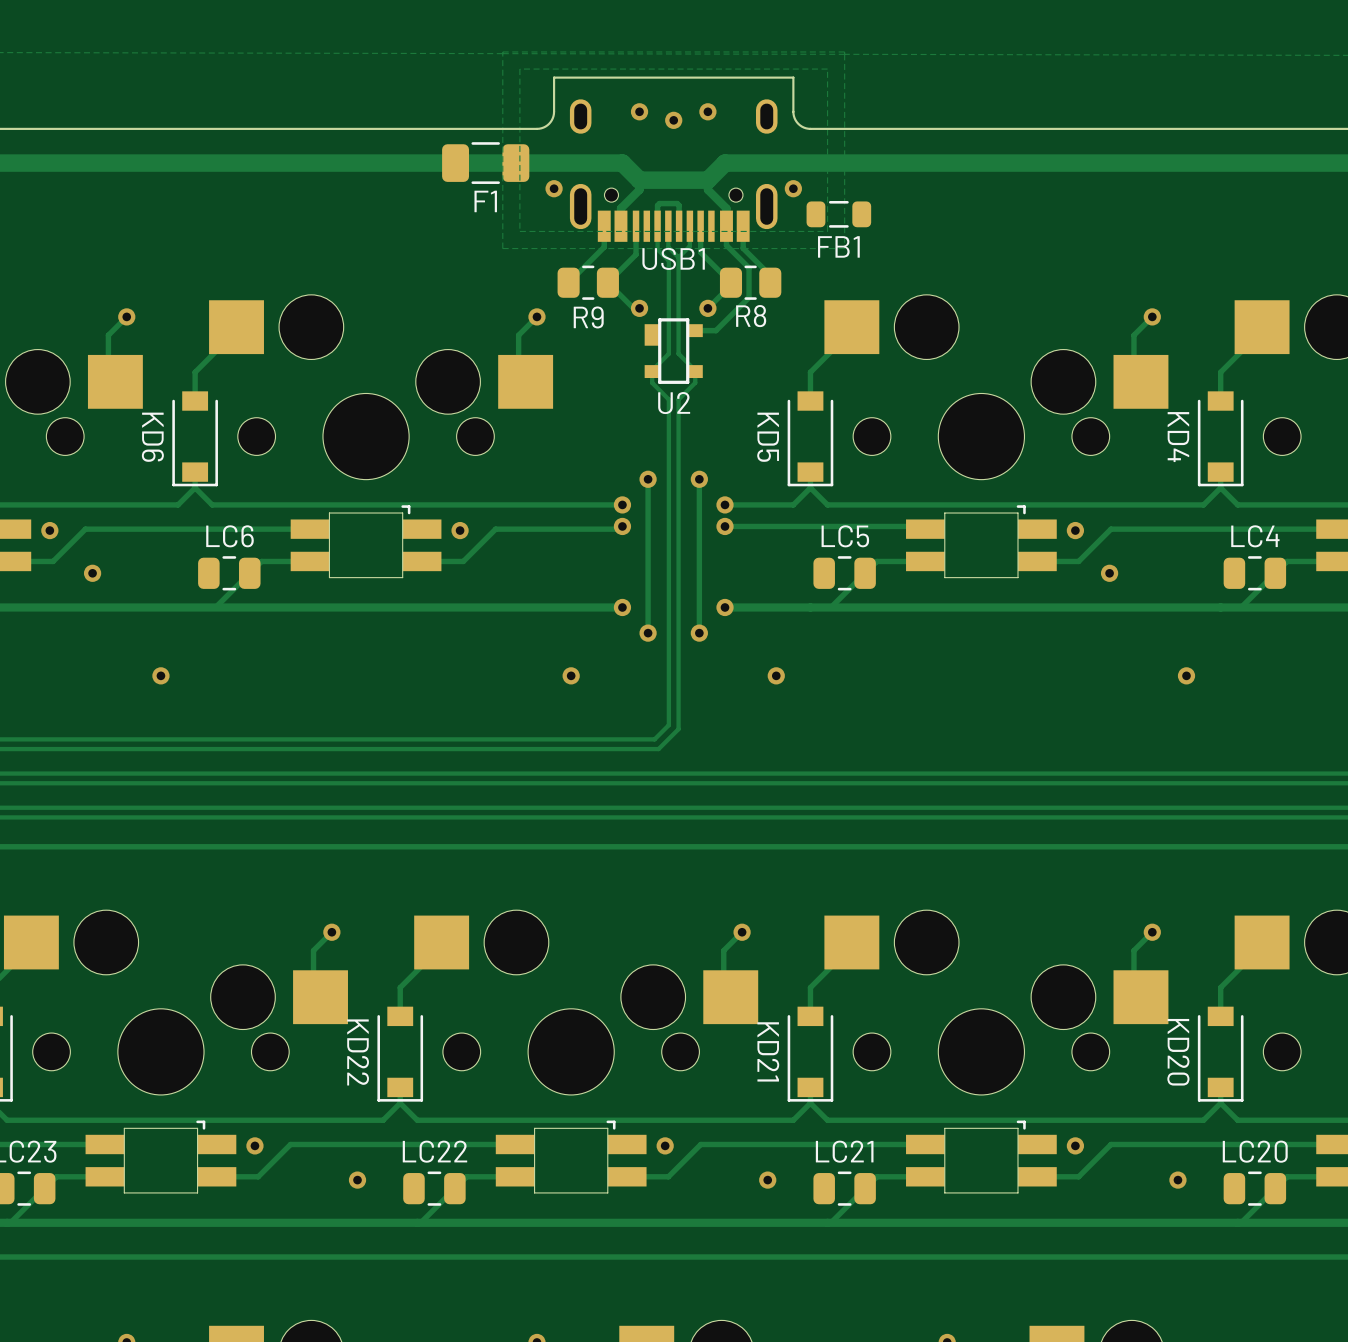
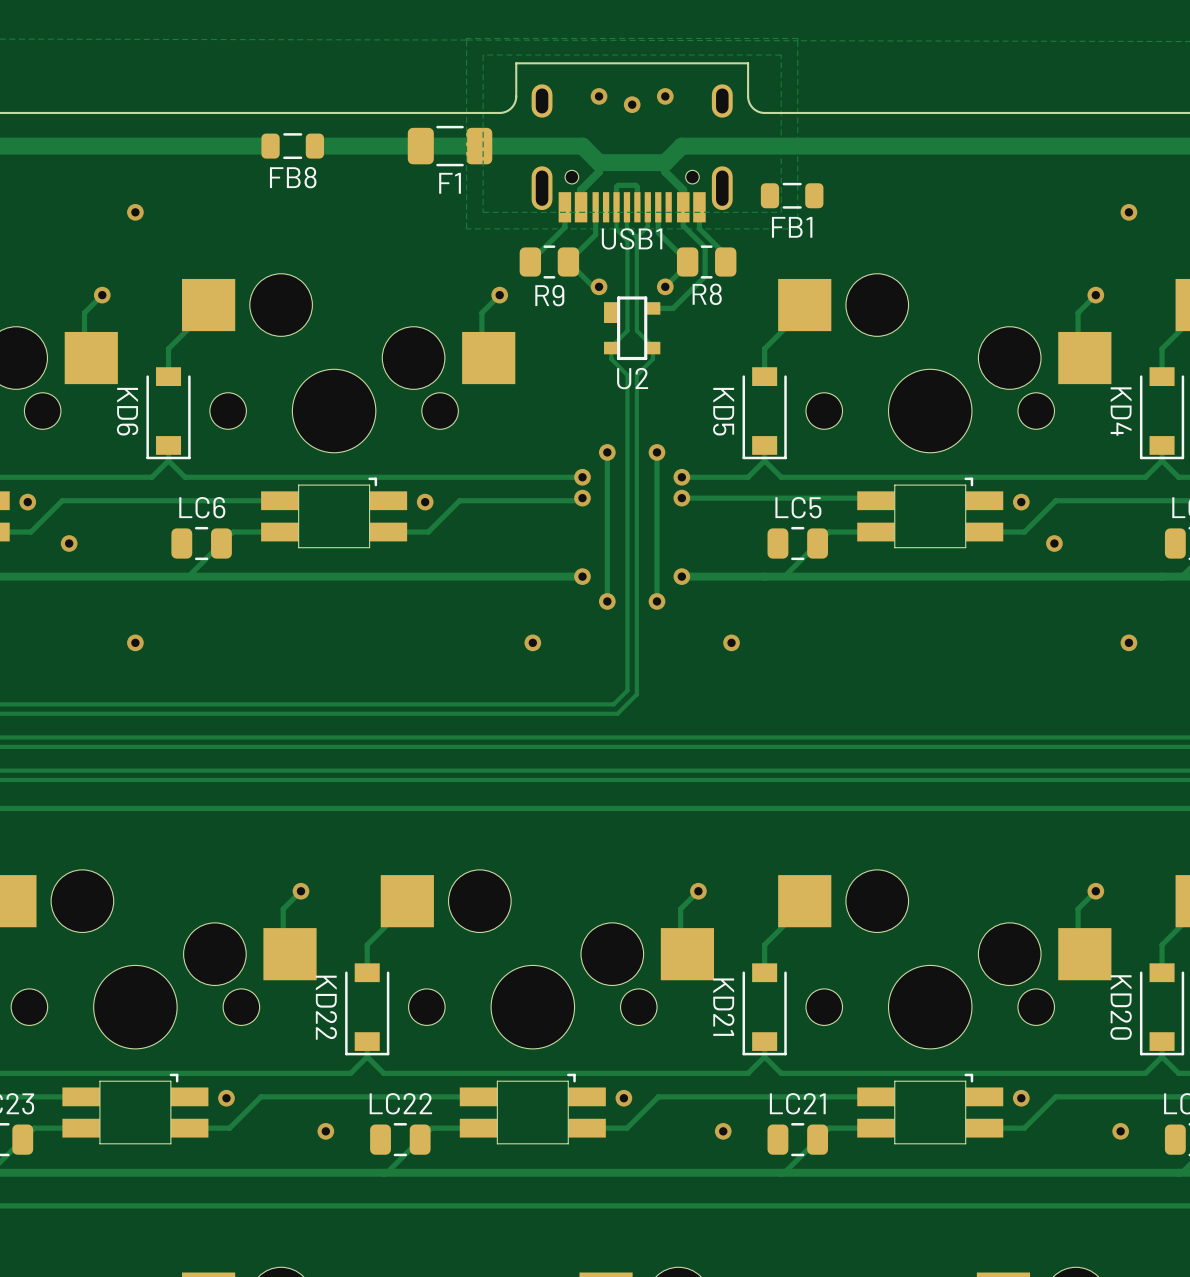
FB8: none -> (292, 146)
track: (346, 163) (300, 163) -> none
via: (554, 188) -> none
via: (793, 188) -> none
via: none -> (135, 212)
via: none -> (1128, 212)

